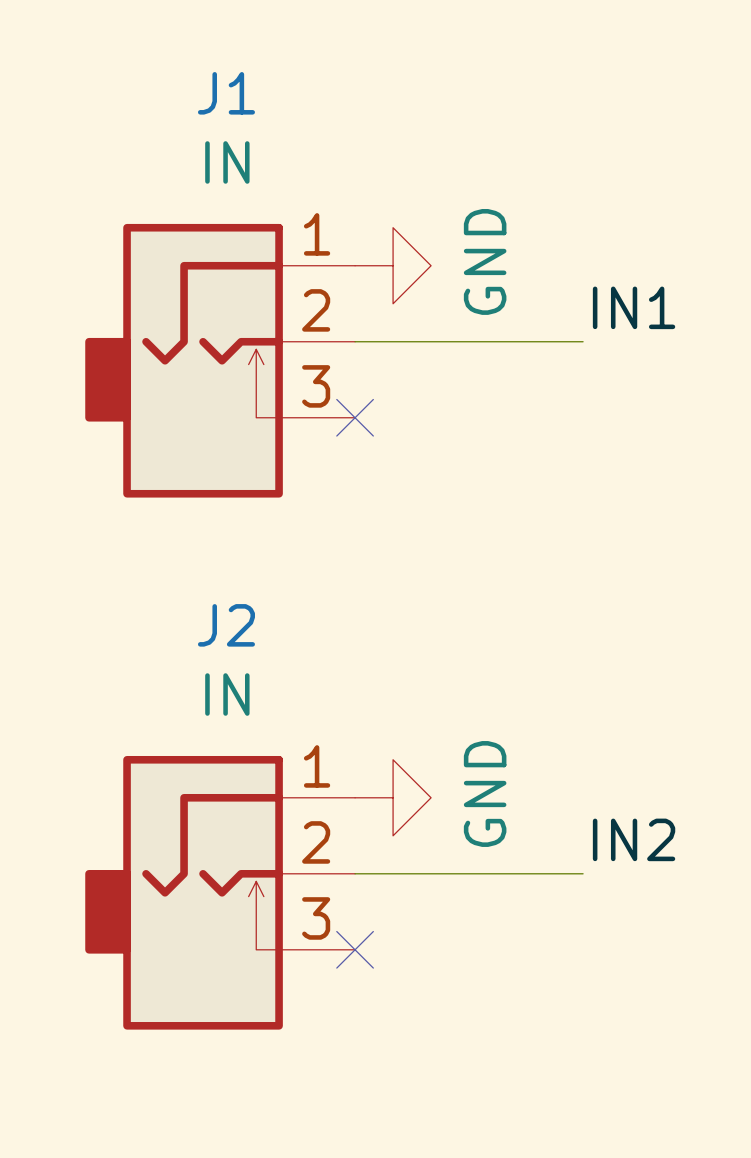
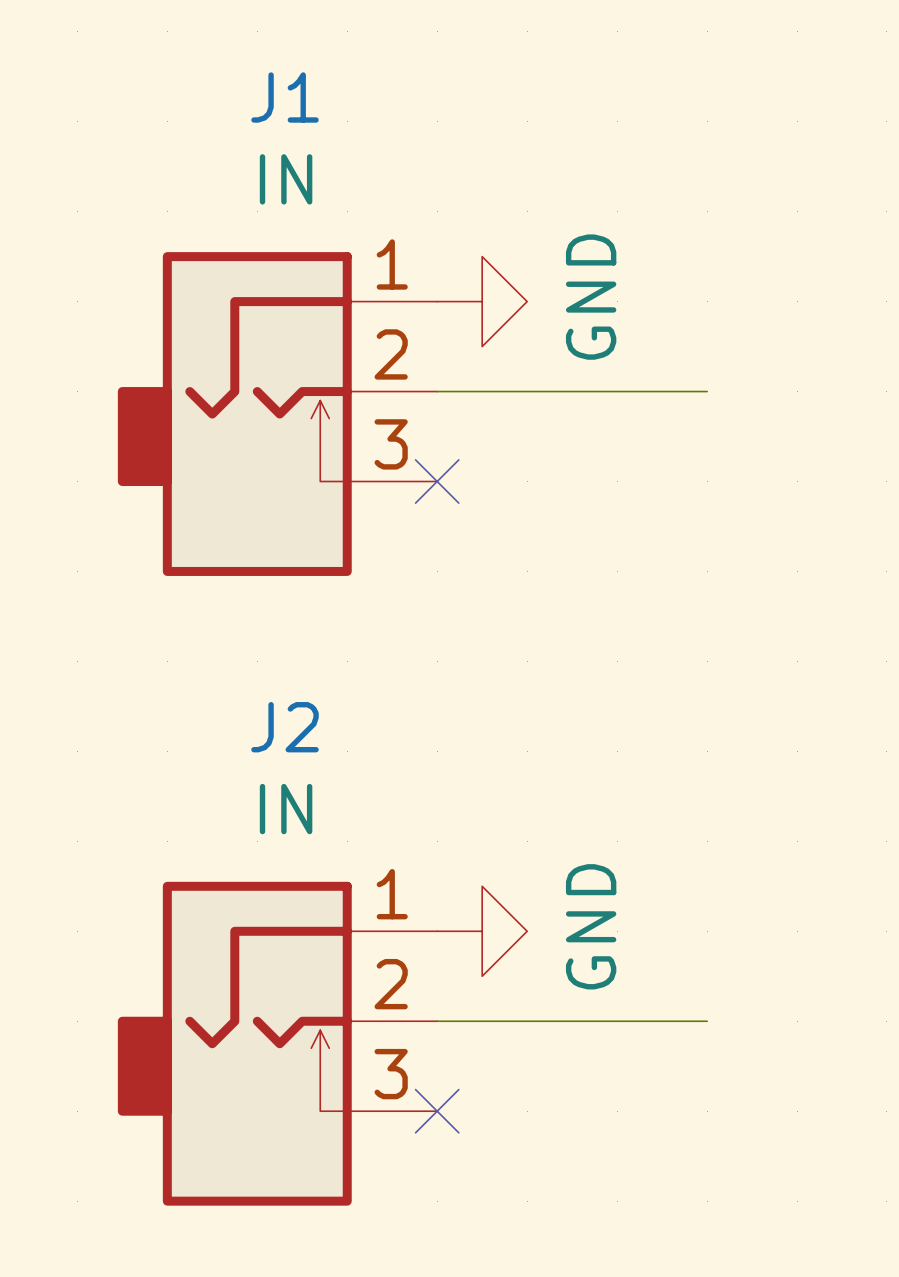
label: IN1 (634, 307) -> none
label: IN2 (634, 839) -> none

